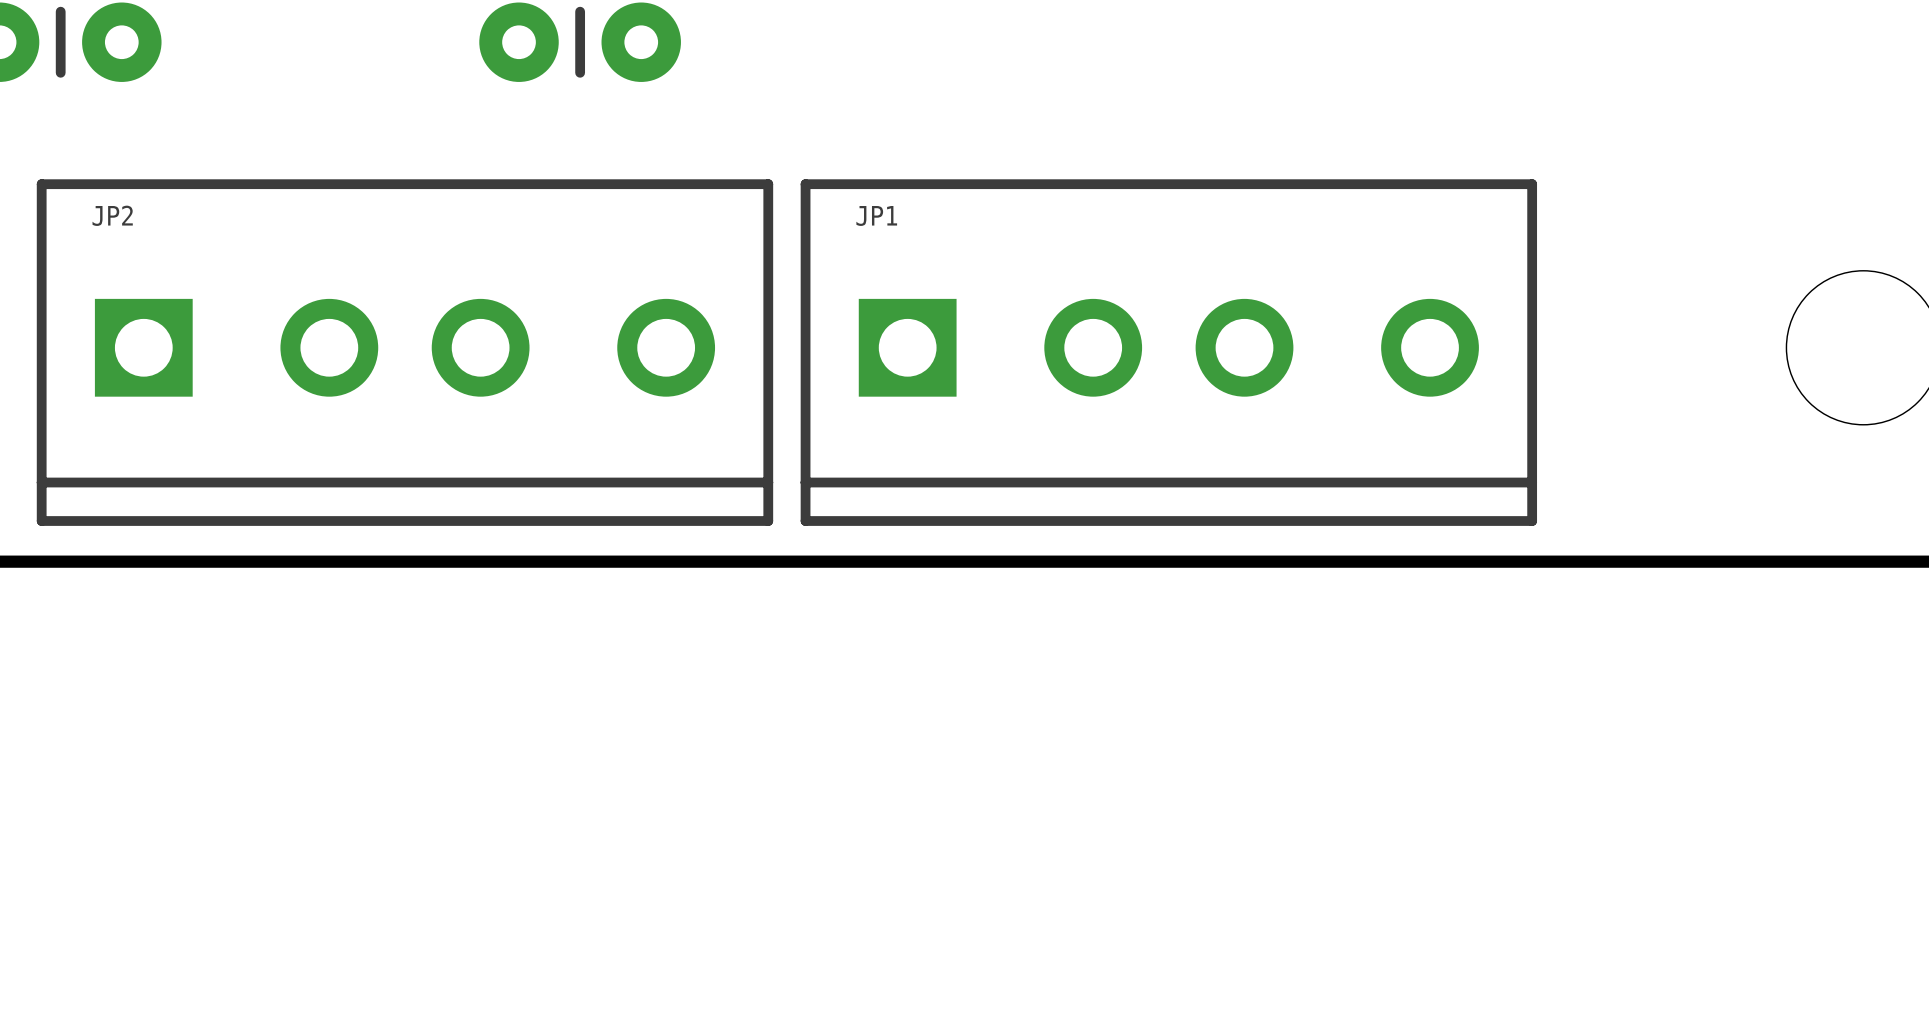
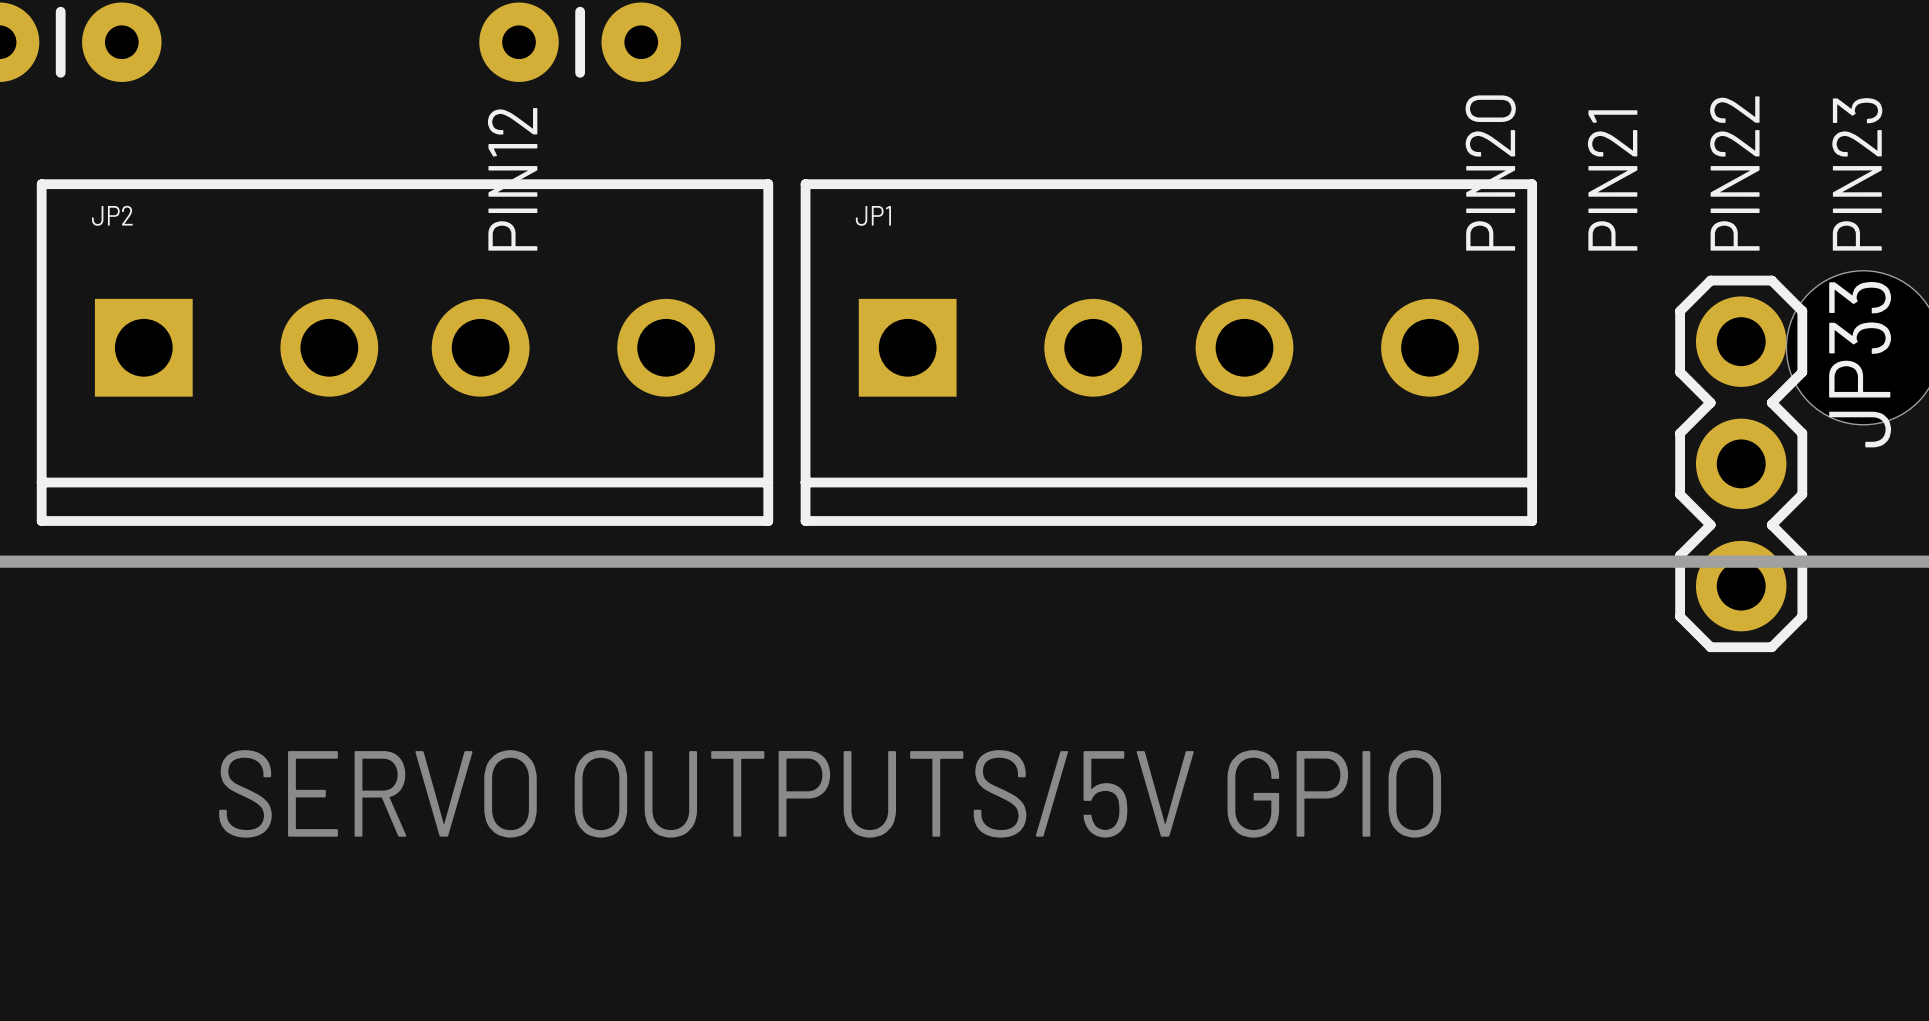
text: none -> PIN12 (512, 179)
text: none -> PIN20 (1490, 173)
text: none -> PIN21 (1612, 180)
text: none -> PIN22 (1734, 173)
text: none -> PIN23 (1857, 174)
JP33: none -> (1741, 463)
text: none -> SERVO OUTPUTS/5V GPIO (830, 793)

